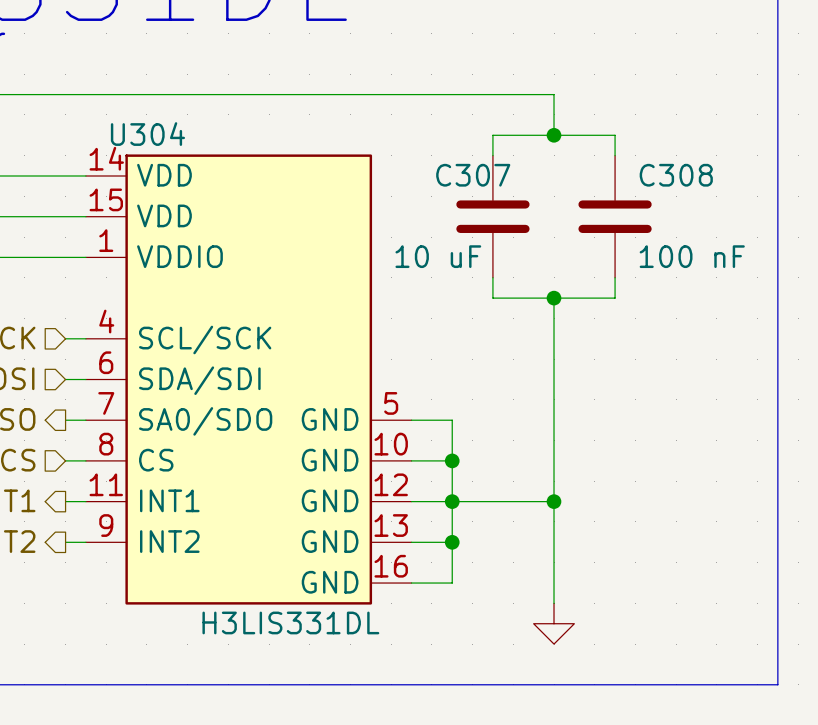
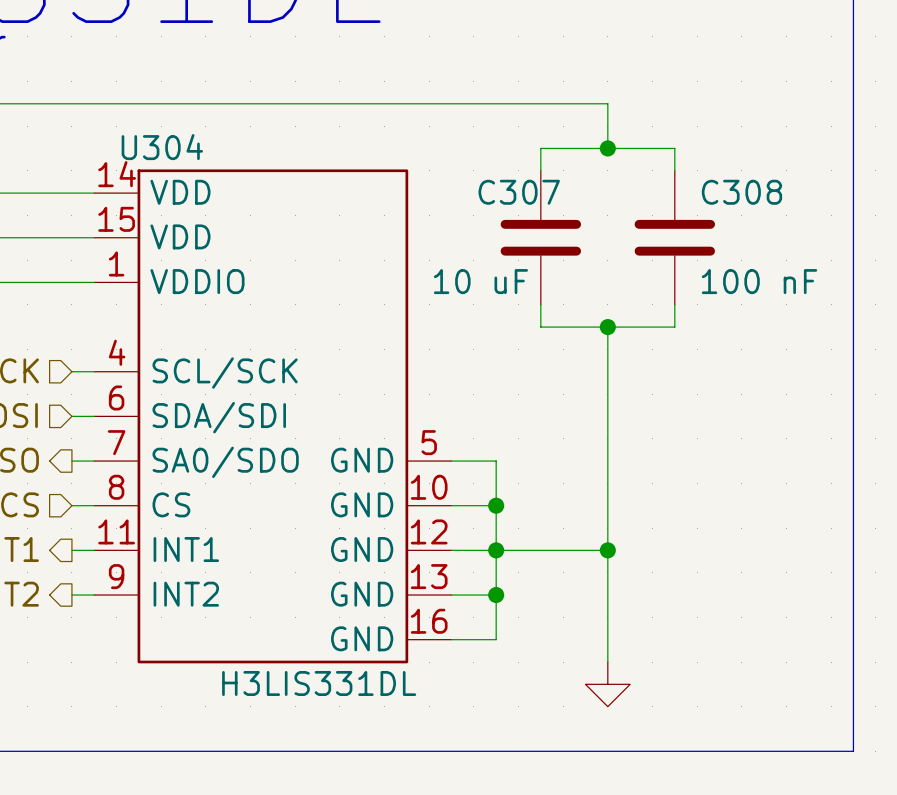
U304 symbol: [85, 154, 412, 605] -> [94, 169, 452, 664]

